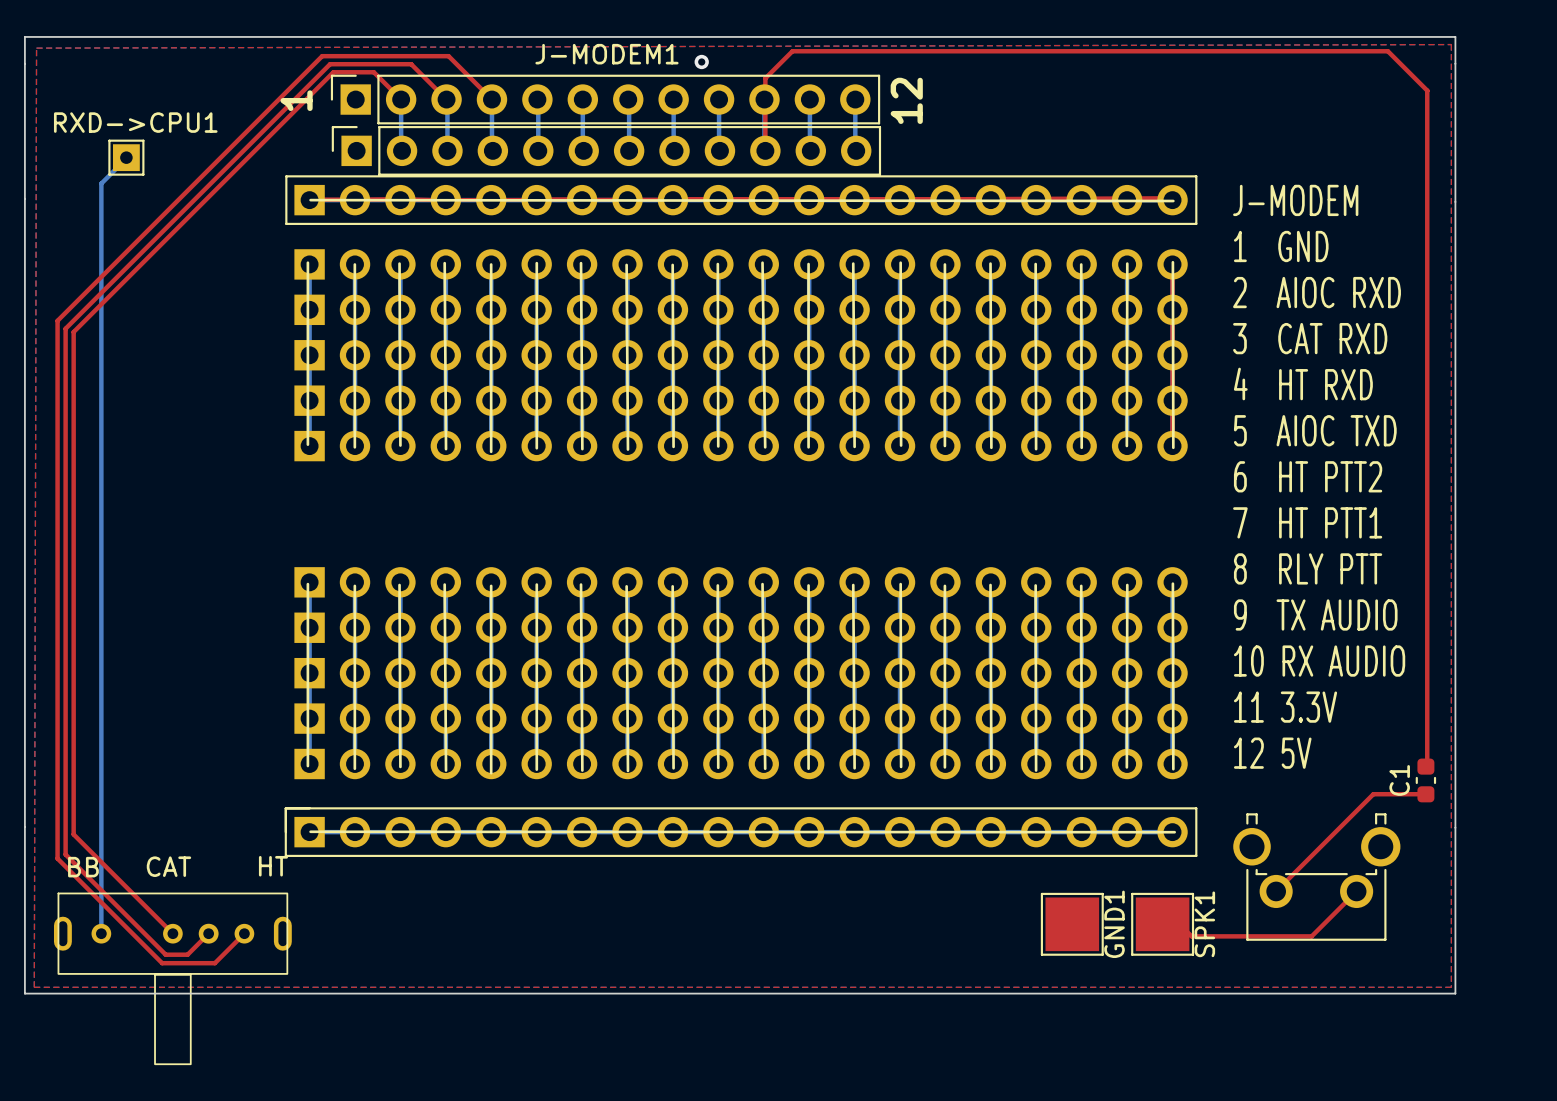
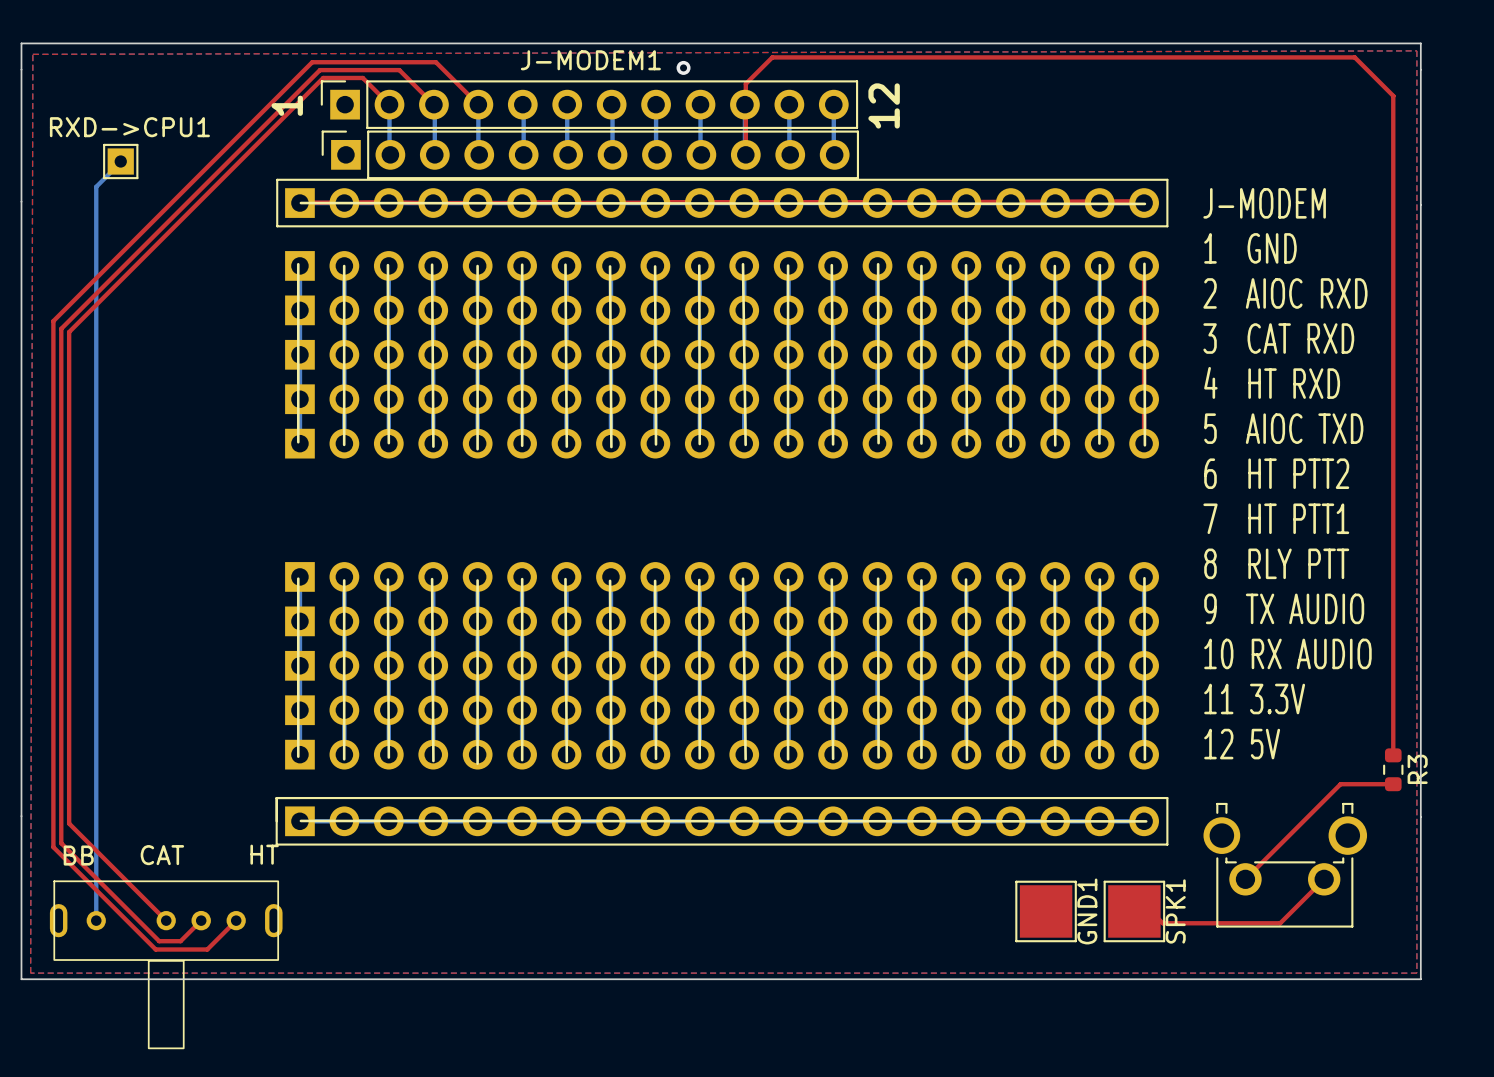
R3: none -> (1393, 769)
C1: (1425, 780) -> none

